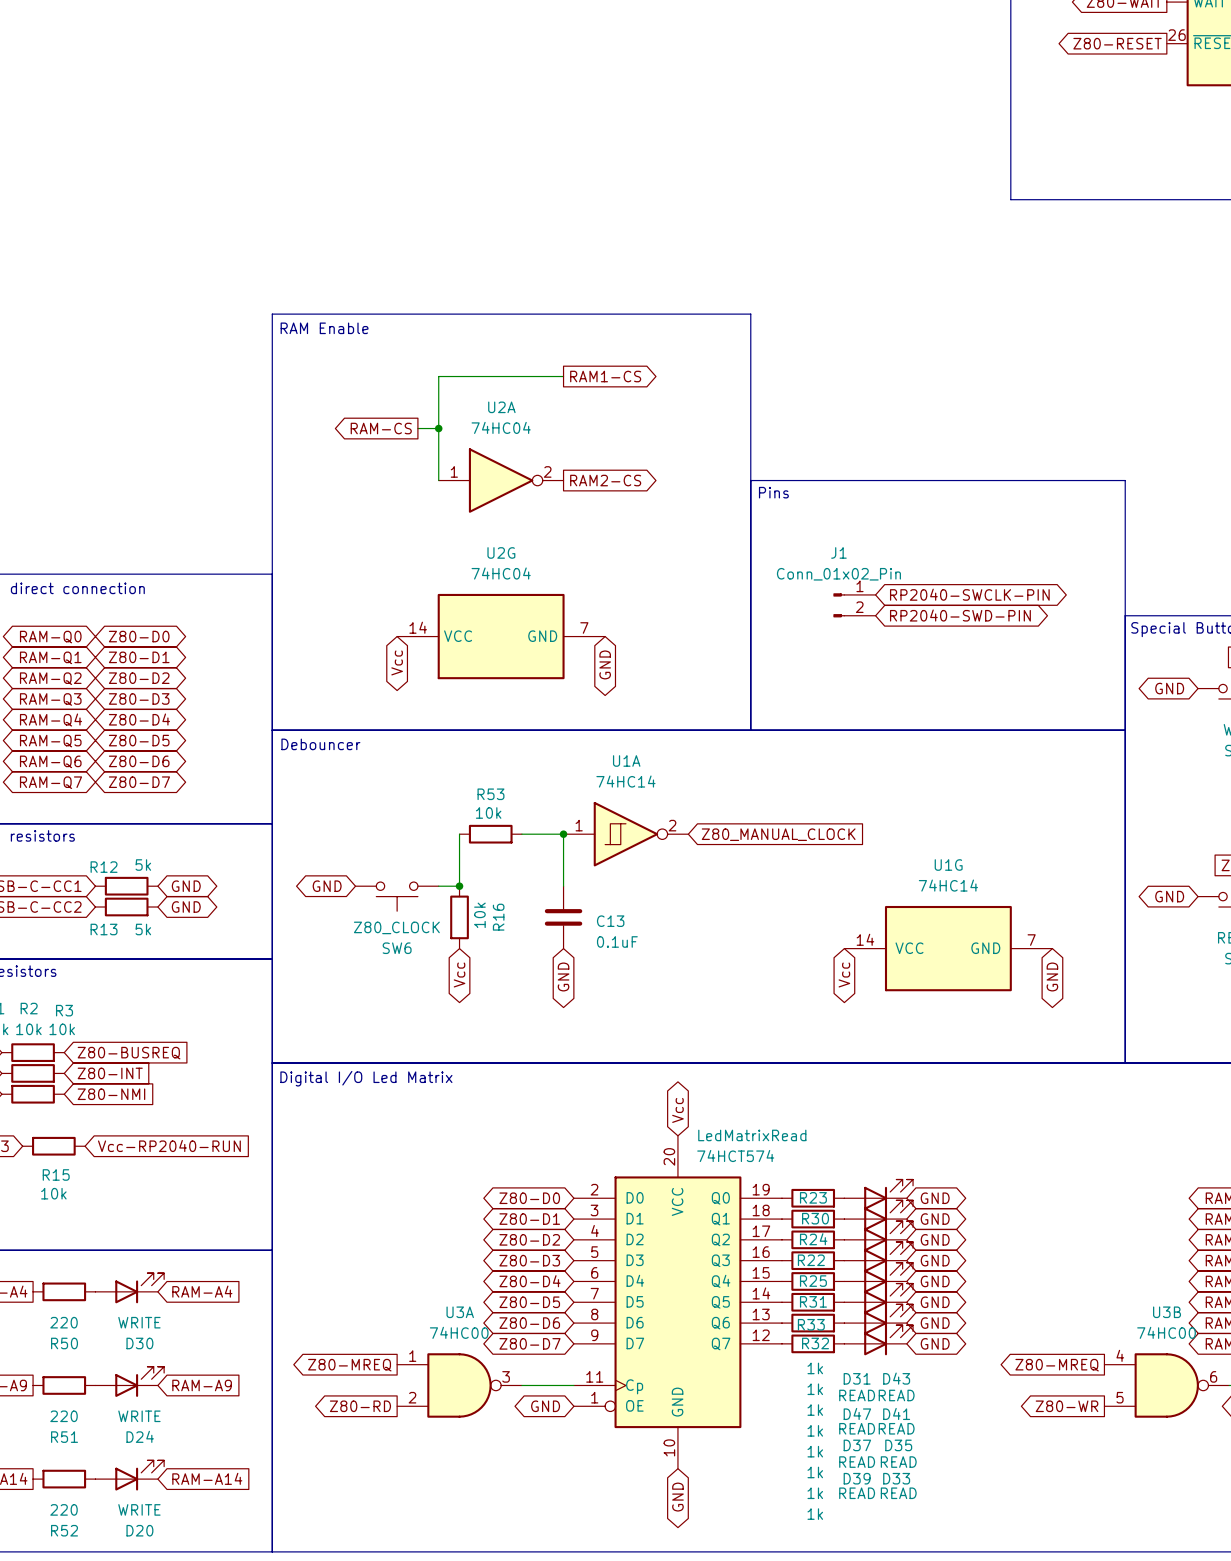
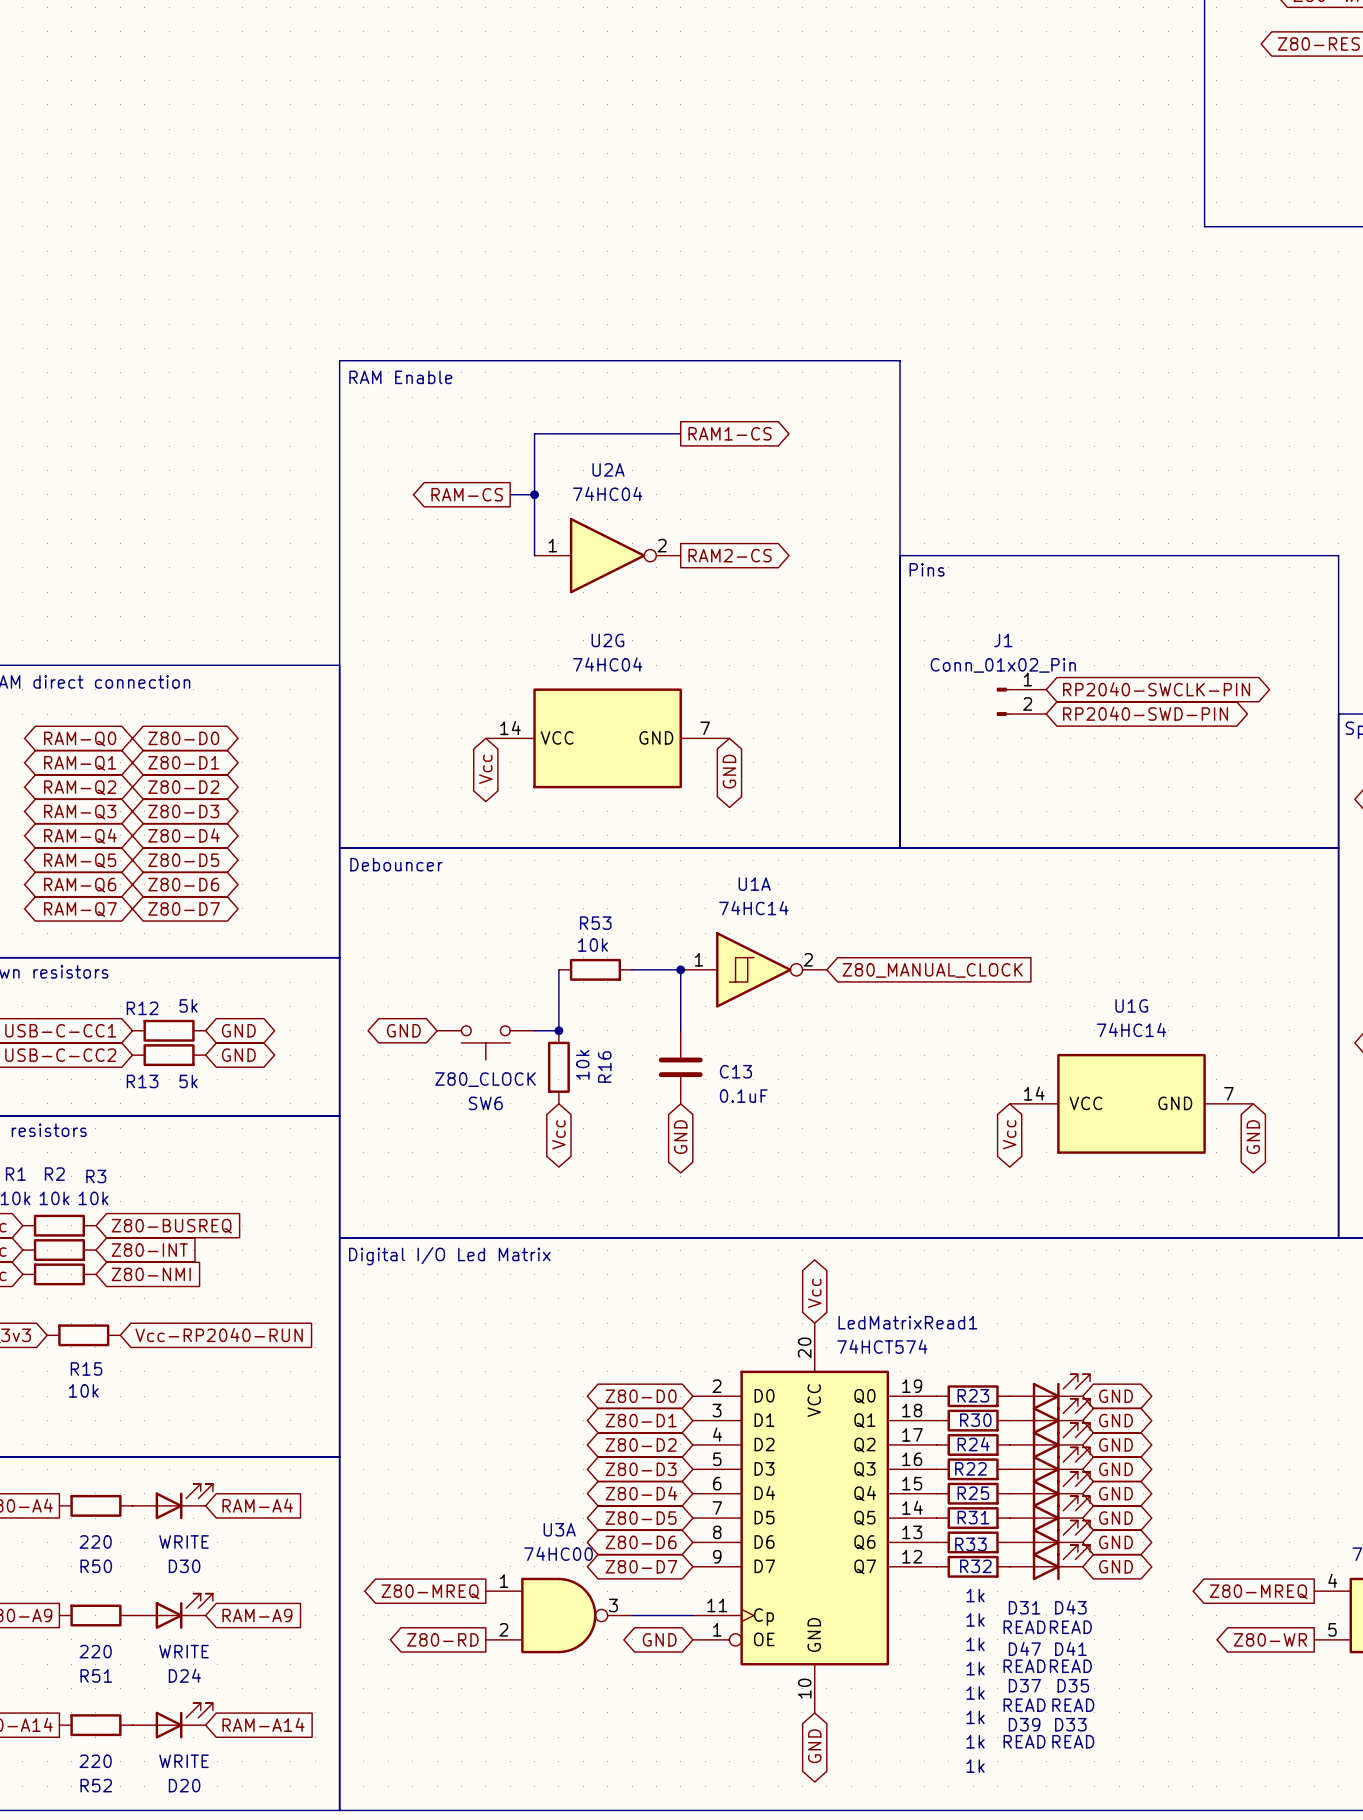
LedMatrixRead name: LedMatrixRead (752, 1135) -> LedMatrixRead1 (907, 1322)

